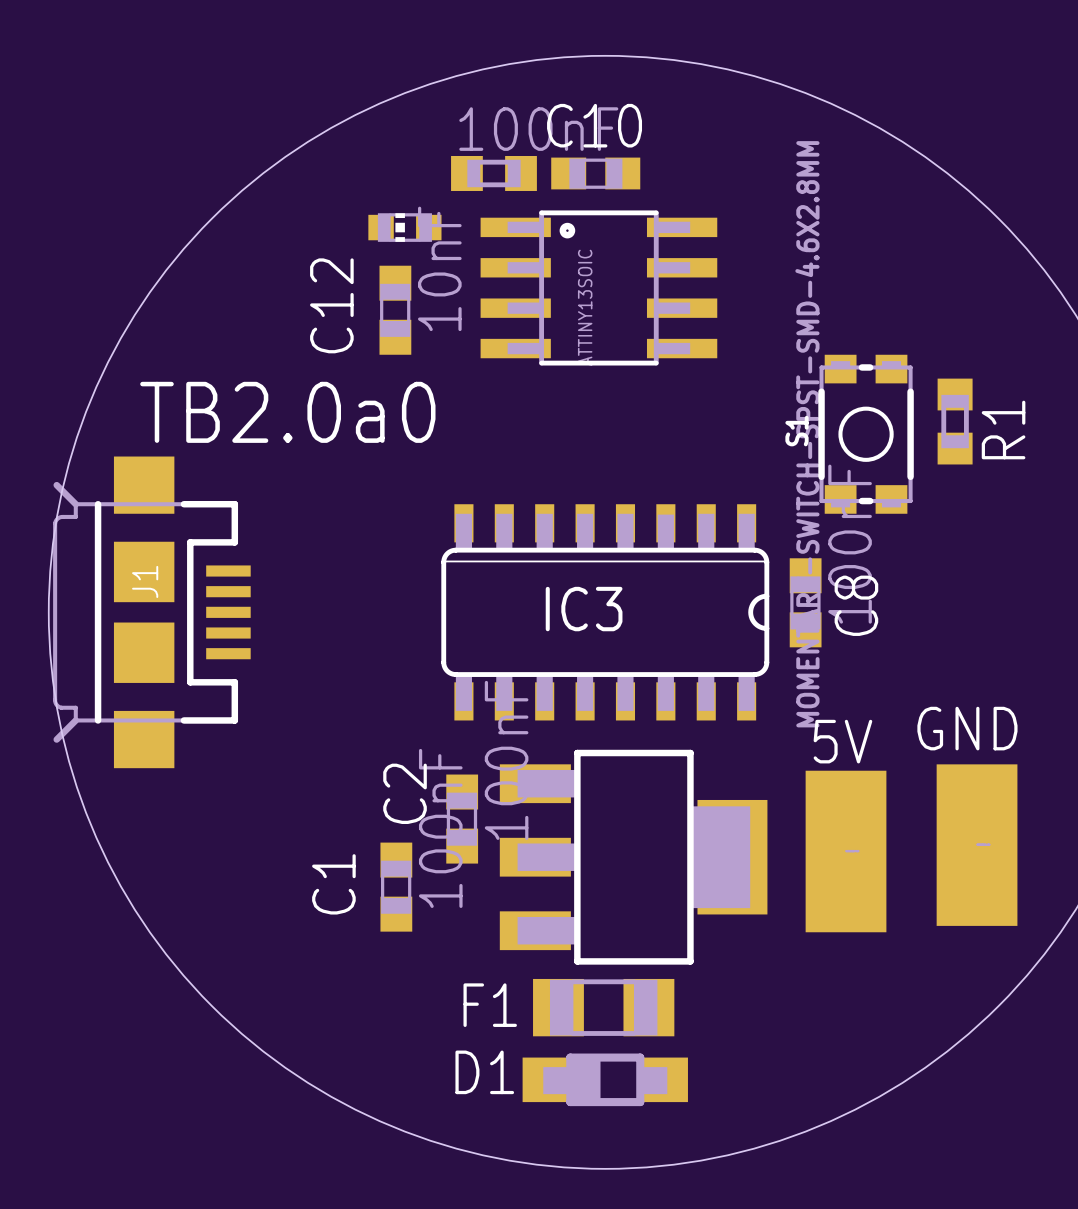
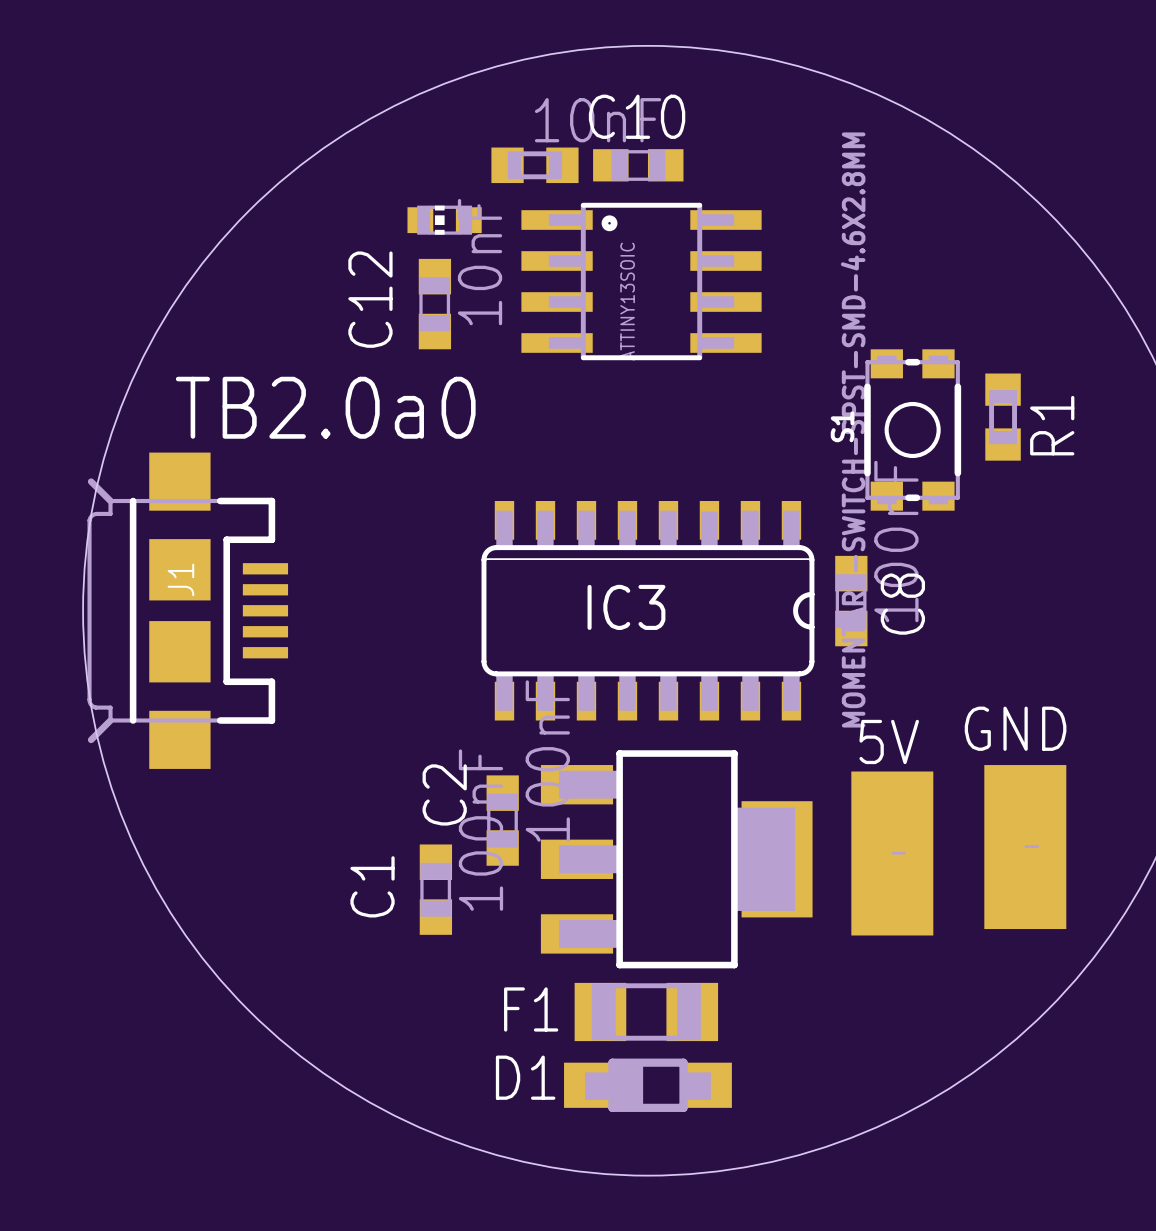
C10 value: 100nF (538, 129) -> 10nF (598, 120)

